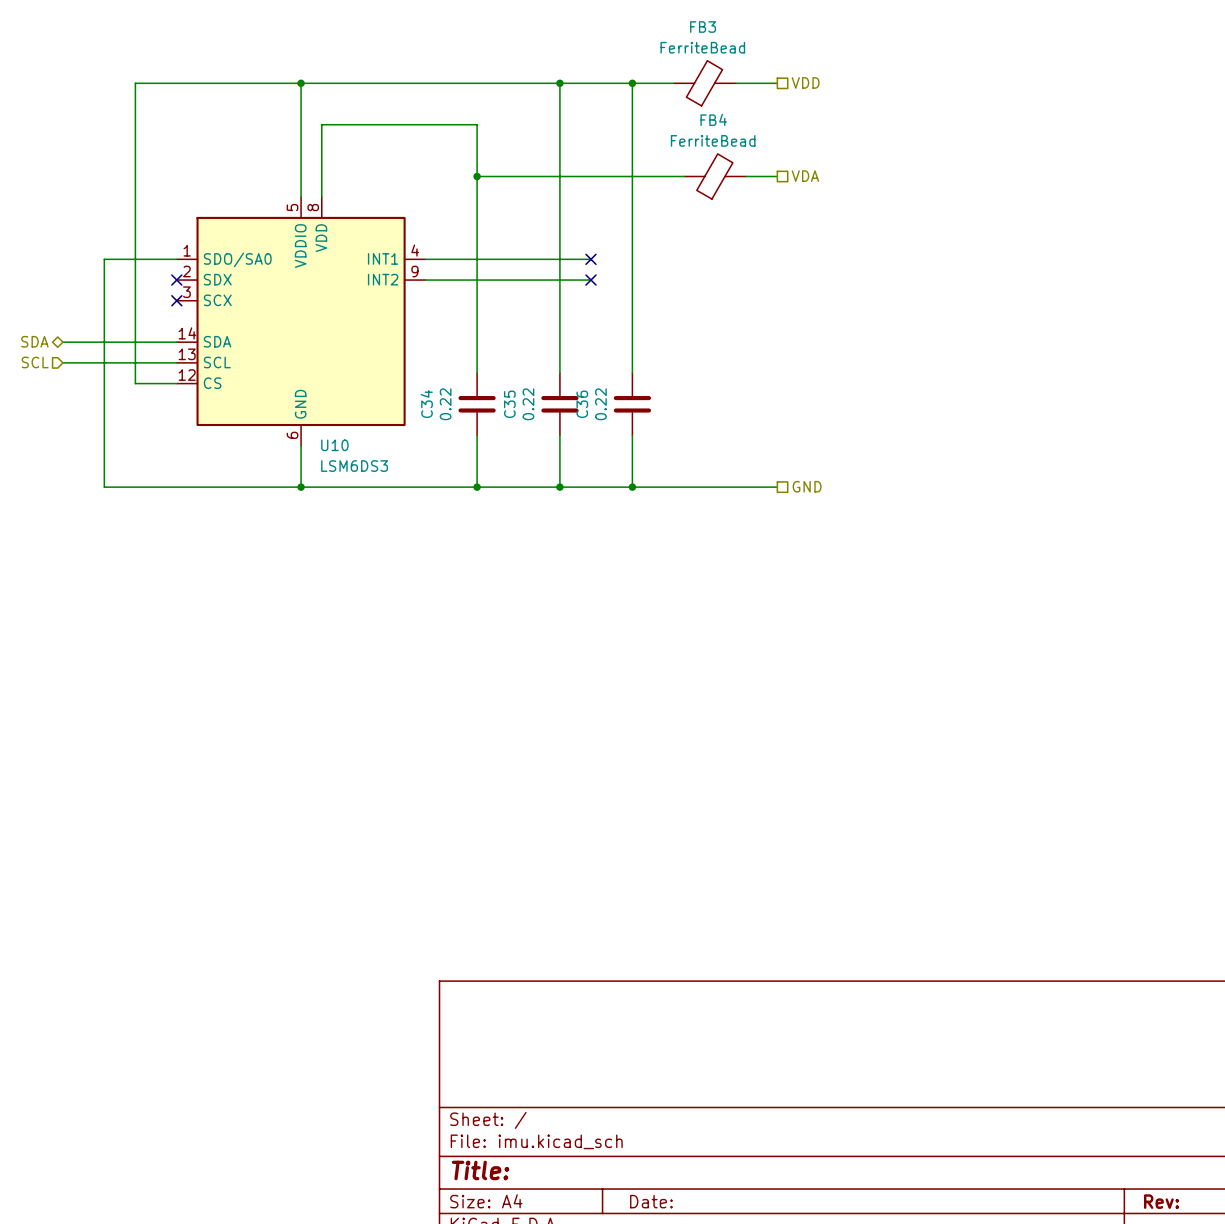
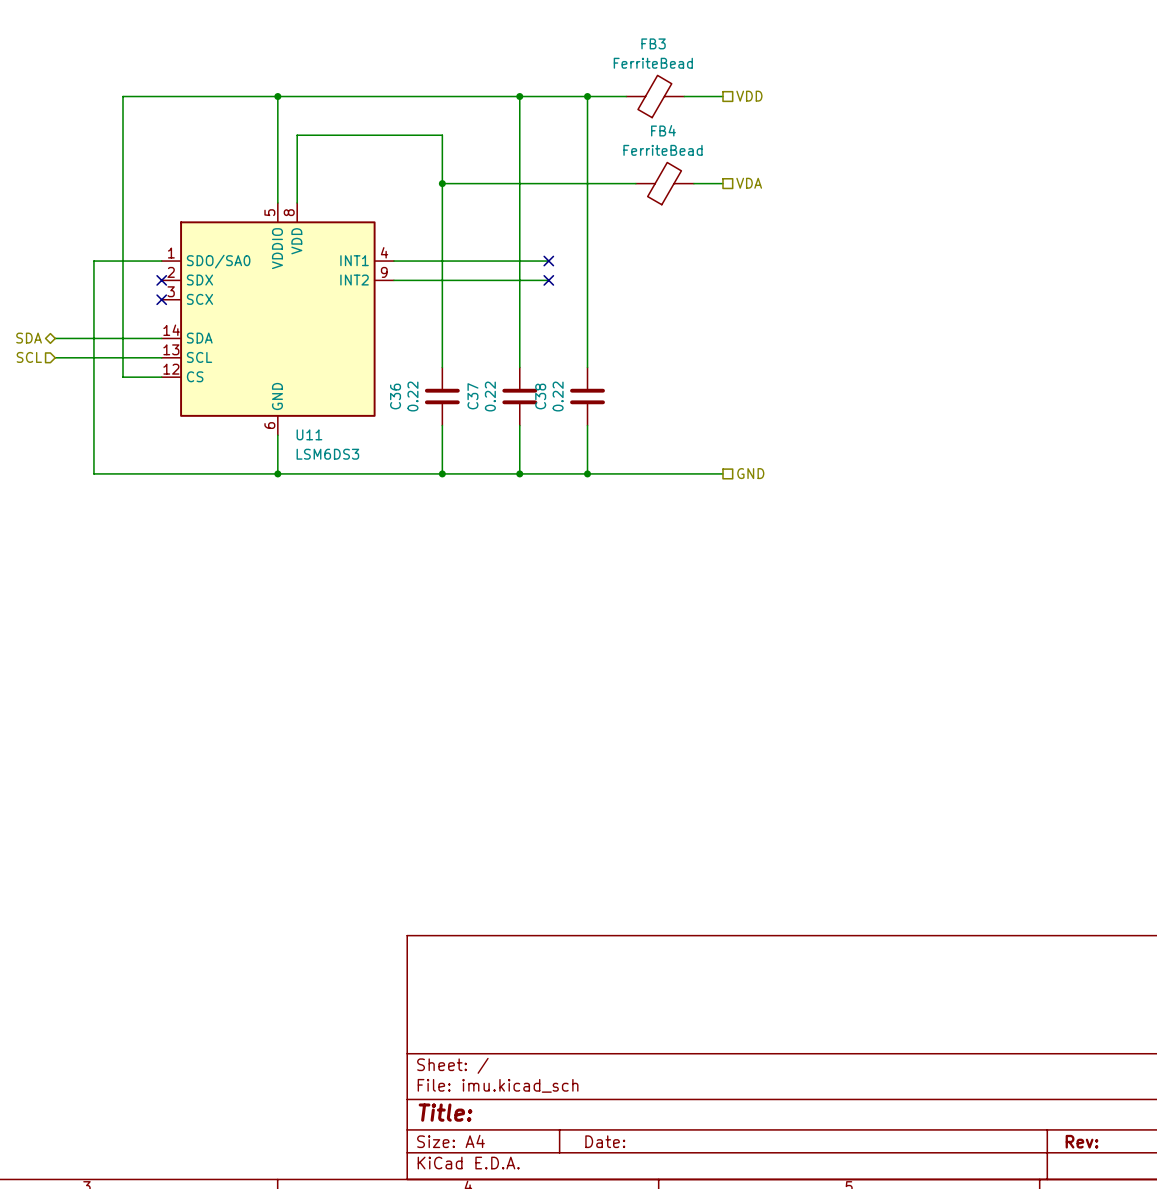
C34 name: C34 (426, 404) -> C36 (395, 396)
C35 name: C35 (509, 404) -> C37 (472, 396)
C36 name: C36 (582, 404) -> C38 (540, 396)
U10 name: U10 (334, 445) -> U11 (309, 434)

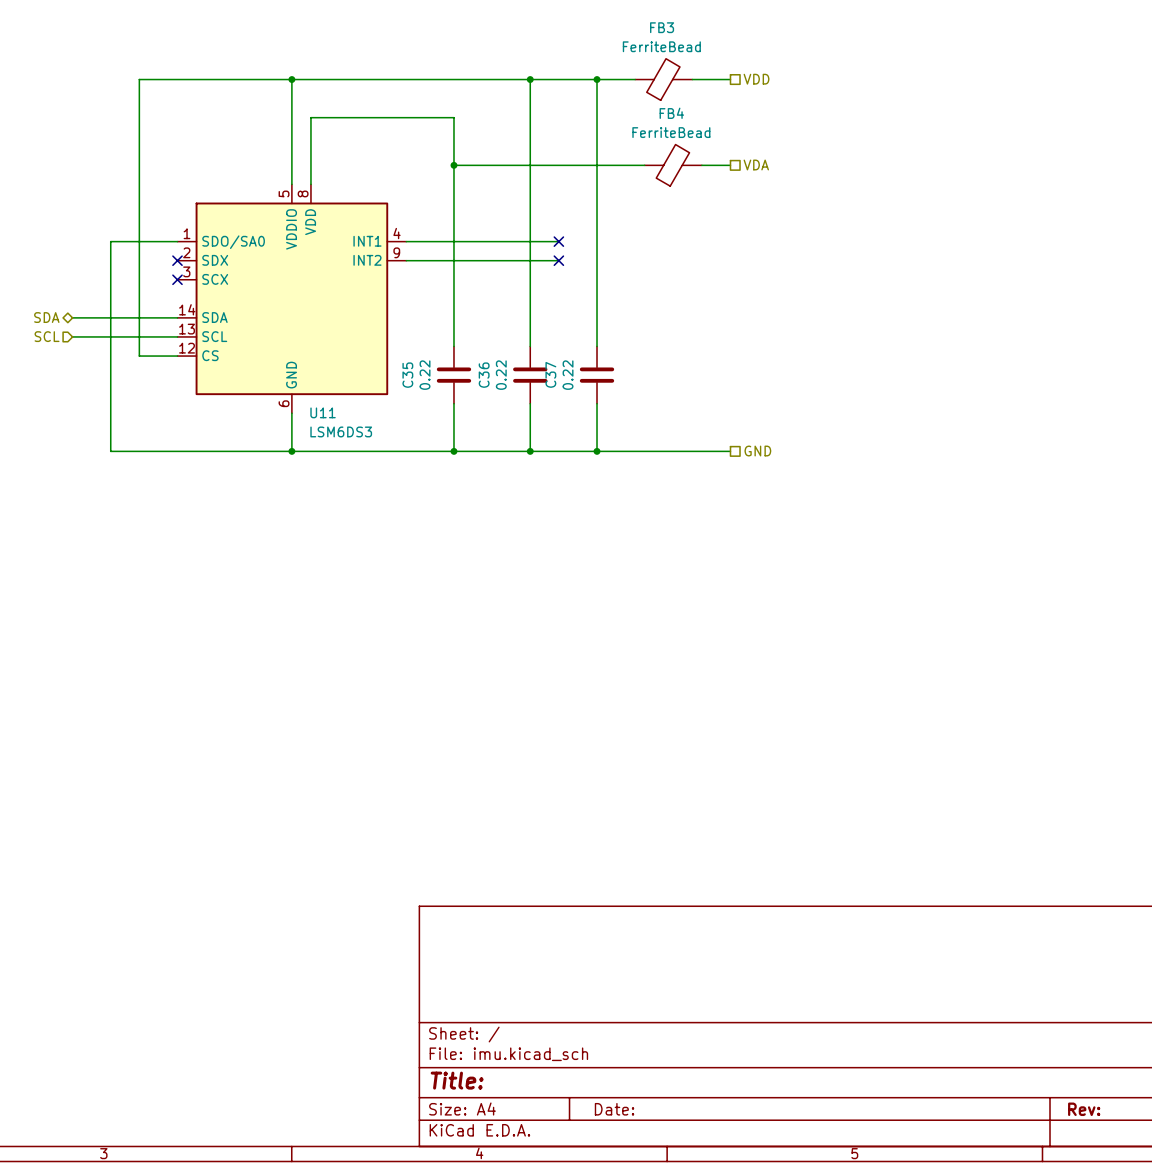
C36 name: C36 (395, 396) -> C35 (407, 375)
C37 name: C37 (472, 396) -> C36 (484, 375)
C38 name: C38 (540, 396) -> C37 (550, 374)

